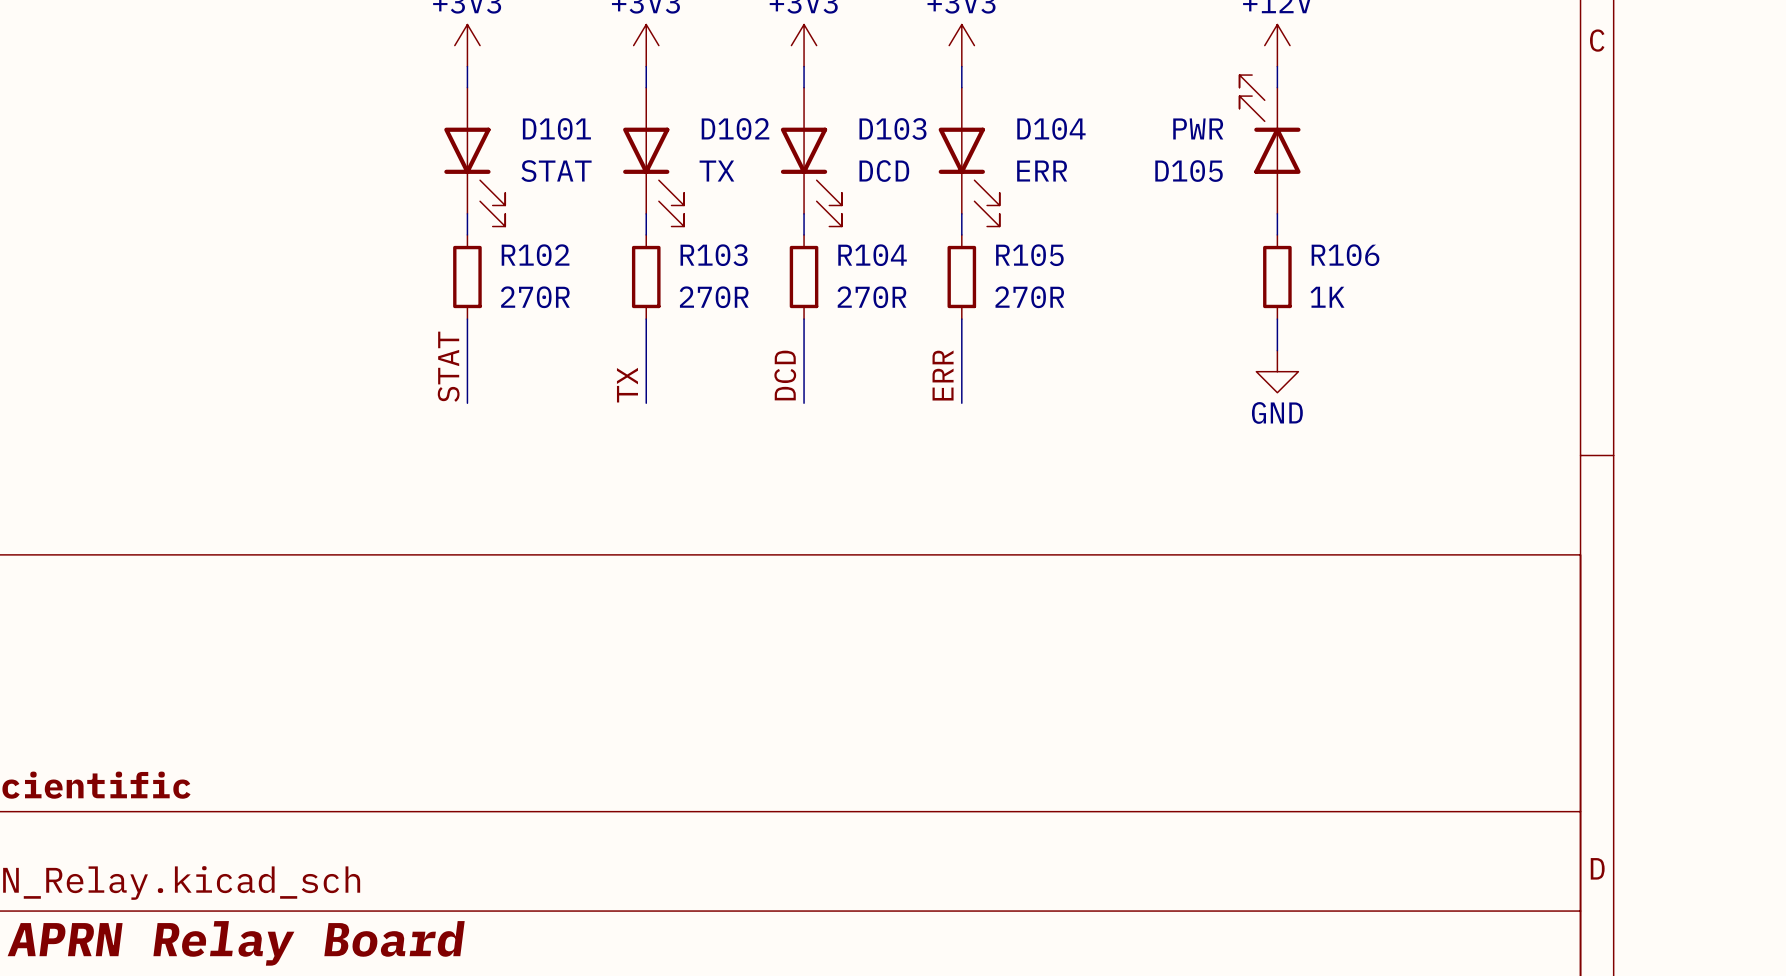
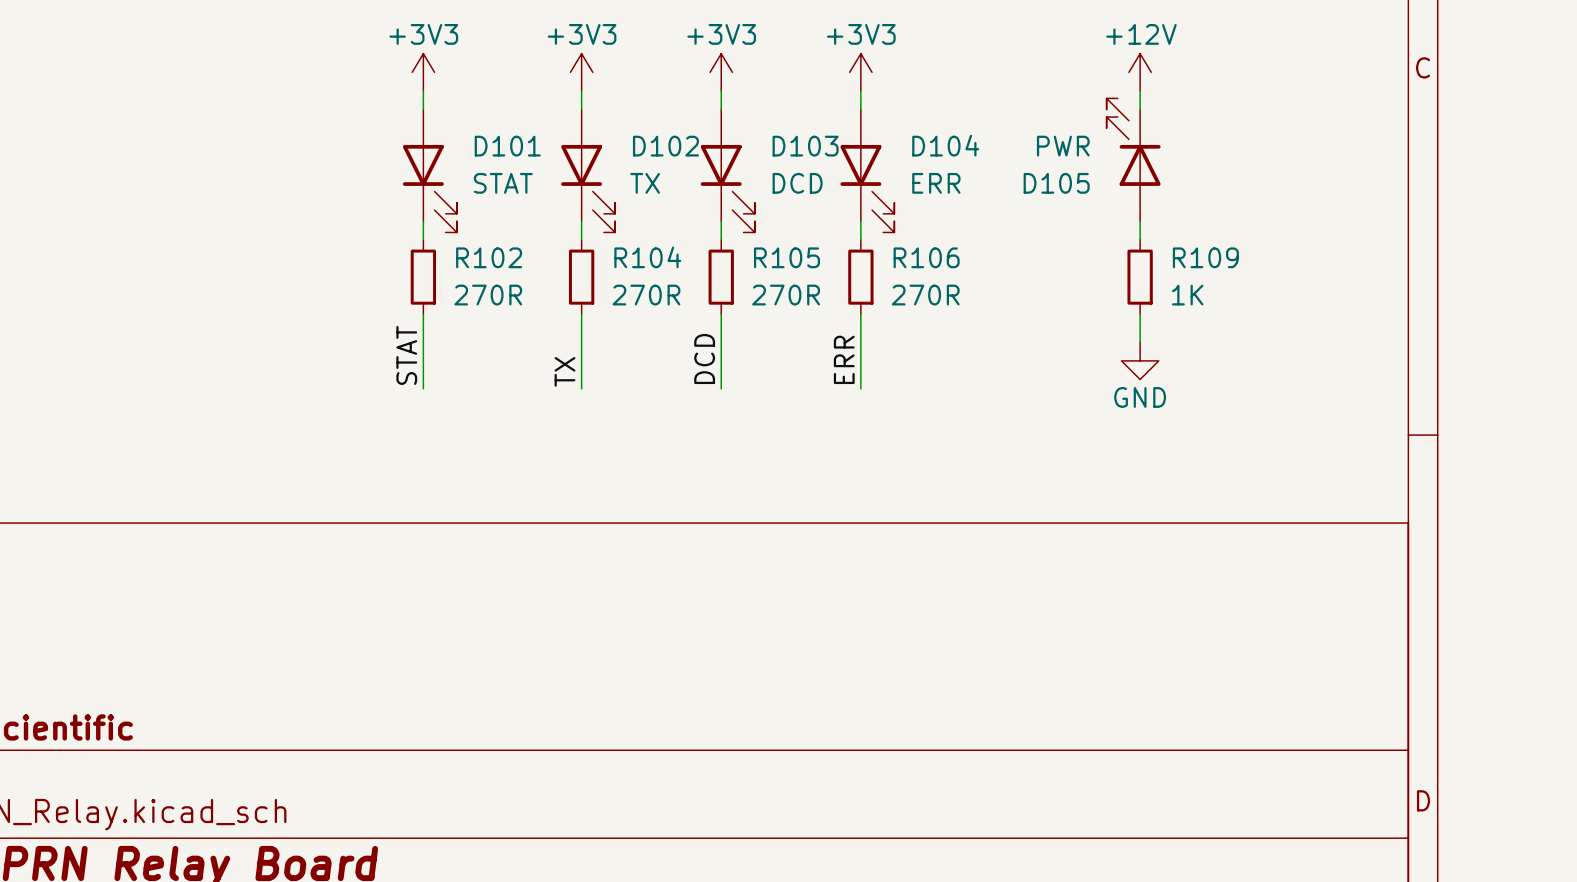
R103 name: R103 (714, 255) -> R104 (647, 257)
R104 name: R104 (872, 255) -> R105 (786, 257)
R105 name: R105 (1029, 255) -> R106 (926, 257)
R106 name: R106 (1345, 255) -> R109 (1205, 257)

